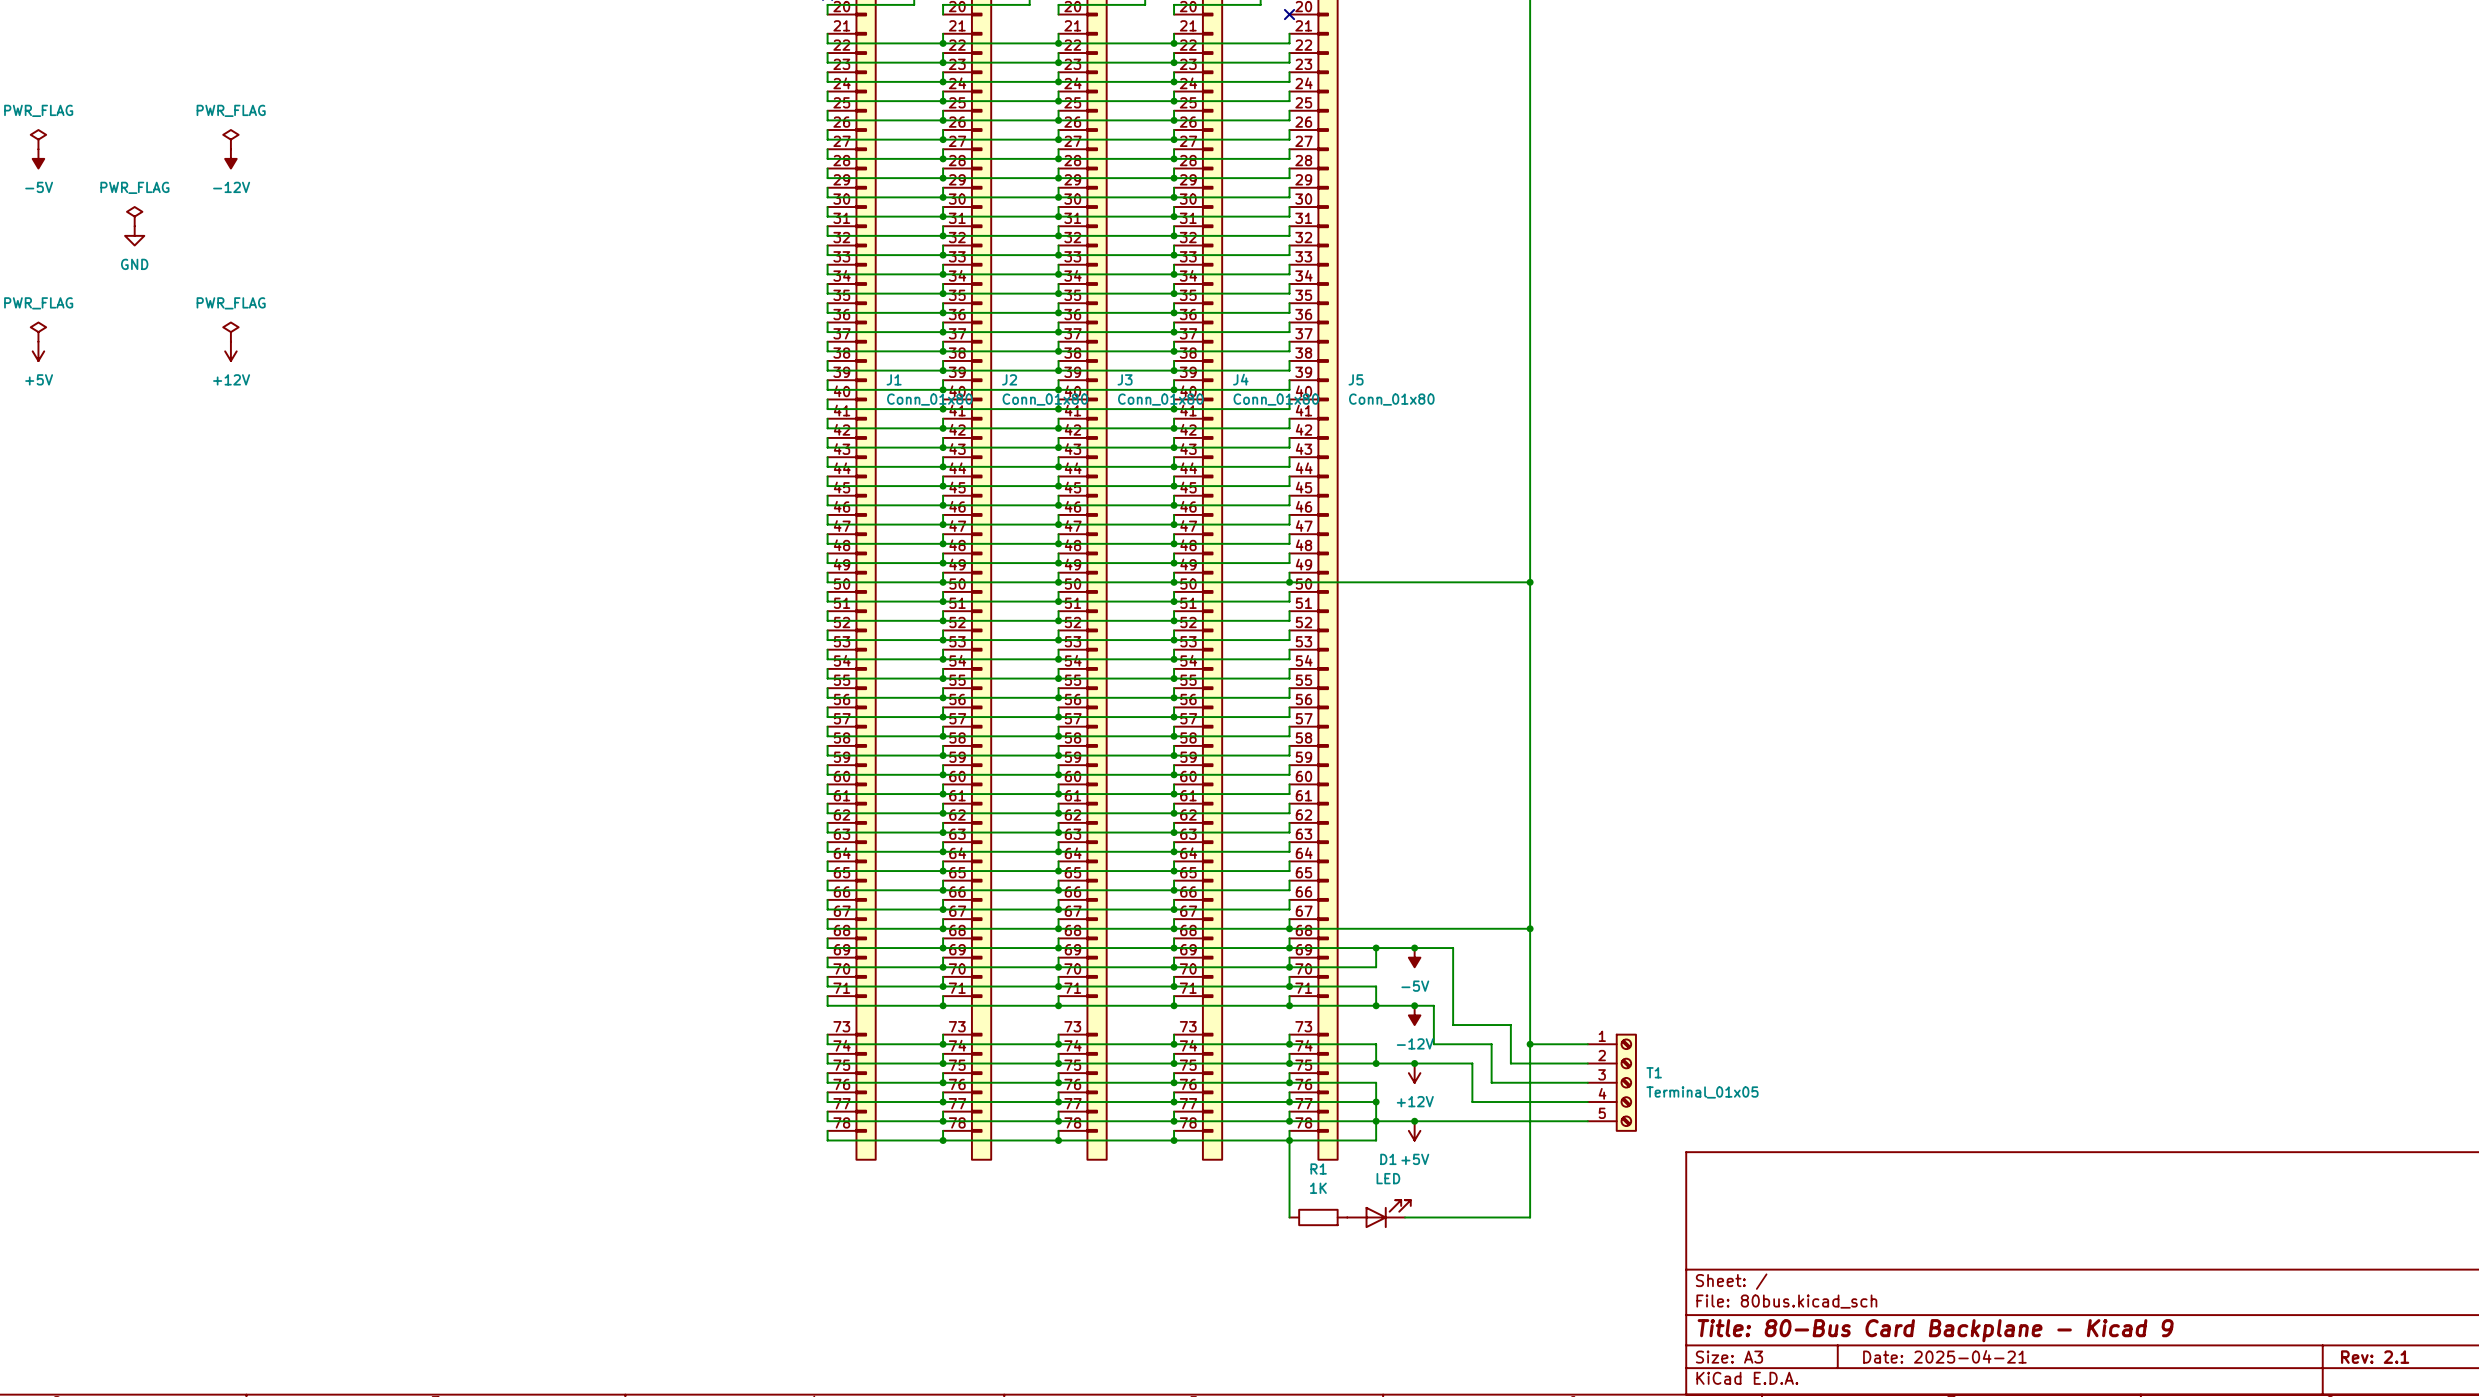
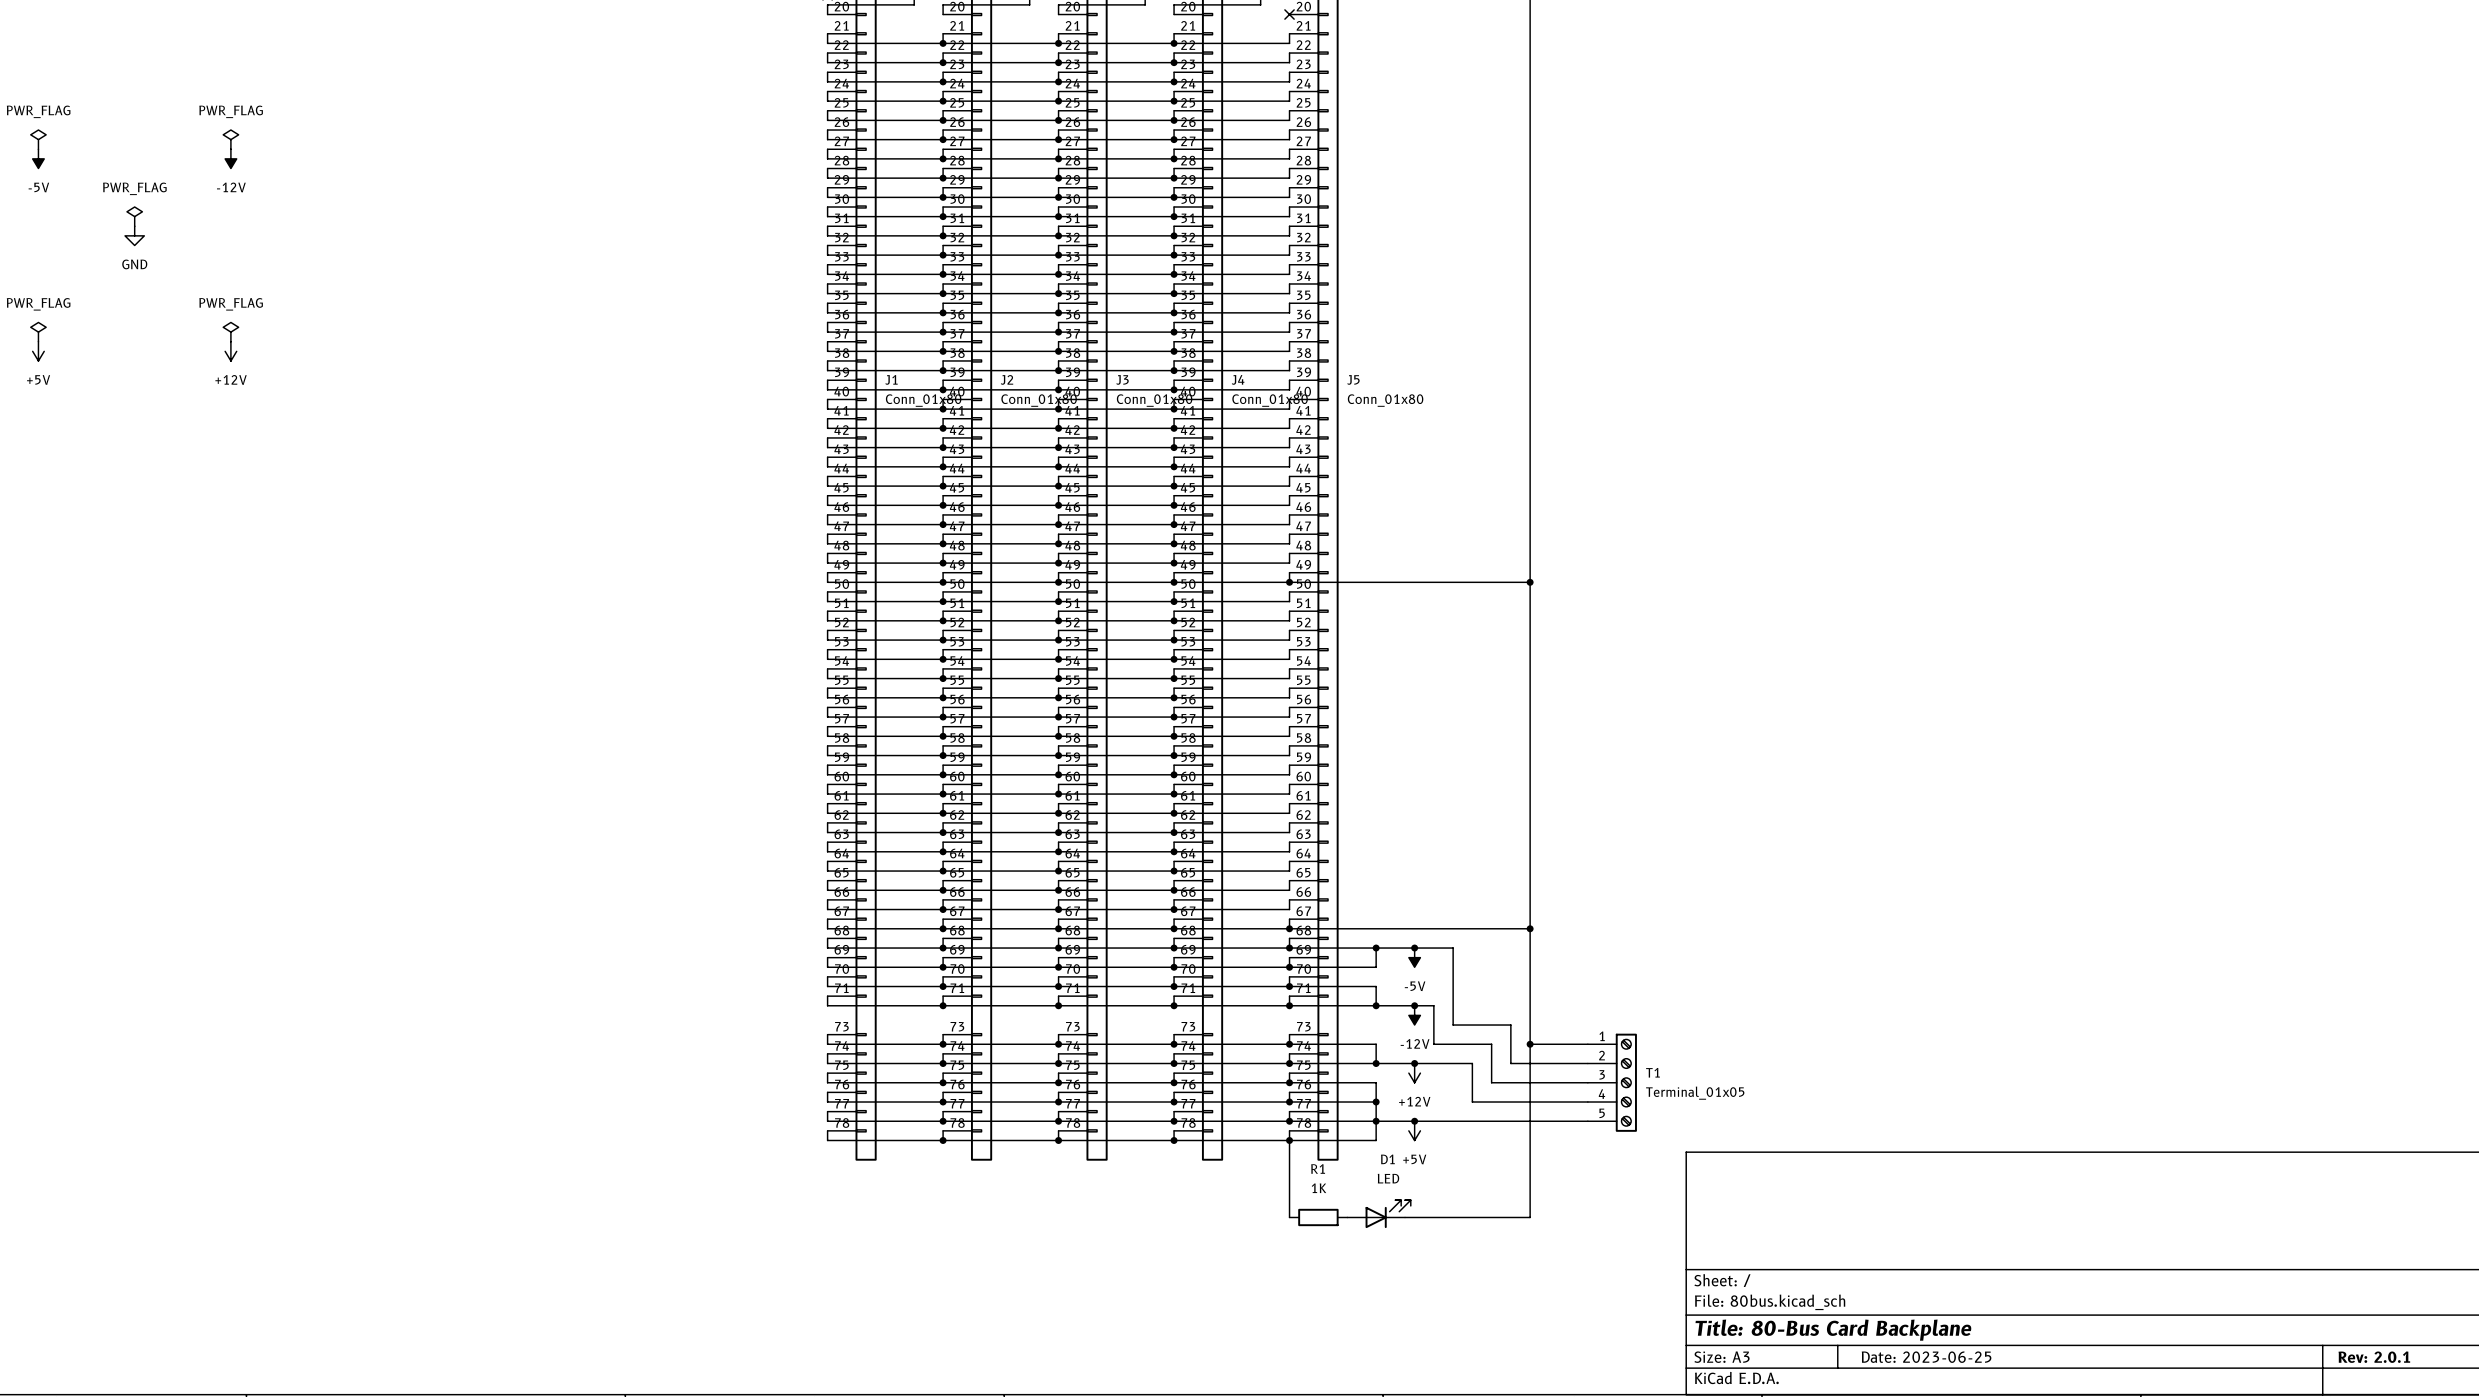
title block: Title: 80-Bus Card Backplane - Kicad 9 (1935, 1330) -> Title: 80-Bus Card Backplane (1833, 1330)
title block: Date: 2025-04-21 (1944, 1356) -> Date: 2023-06-25 (1926, 1357)
title block: Rev: 2.1 (2375, 1357) -> Rev: 2.0.1 (2374, 1357)

